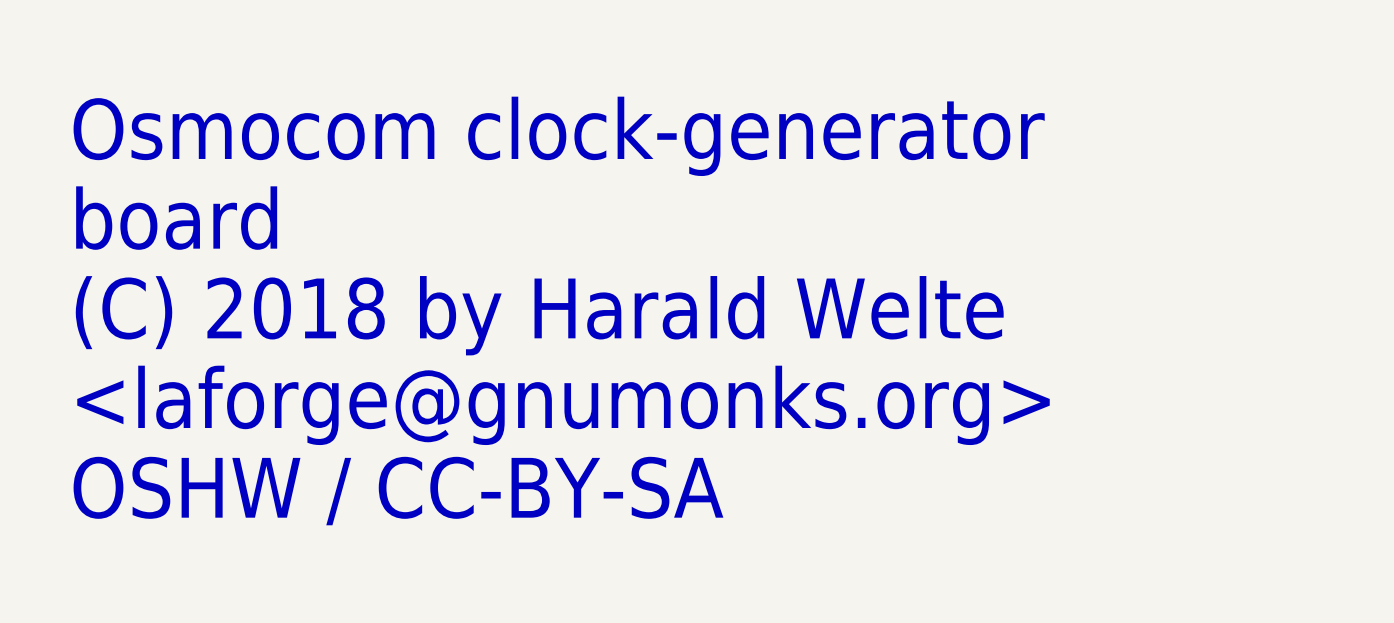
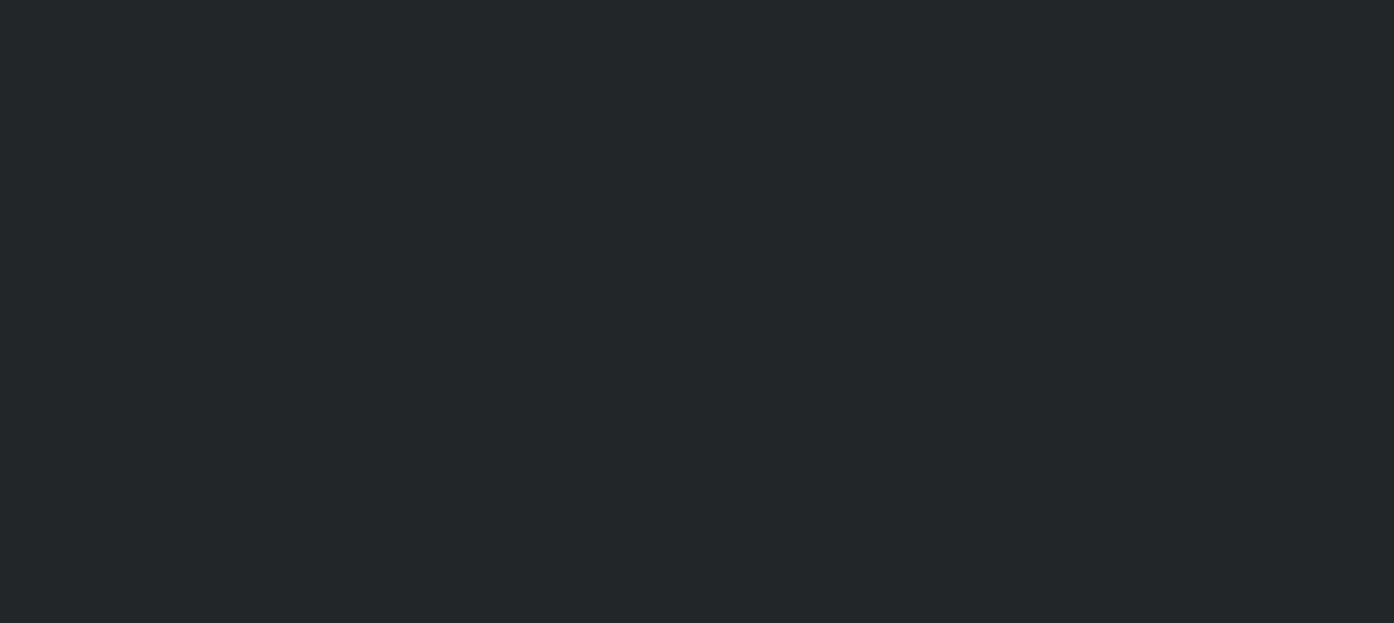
text: Osmocom clock-generator (559, 136) -> none
text: board (176, 218) -> none
text: (C) 2018 by Harald Welte (539, 315) -> none
text: <laforge@gnumonks.org> (563, 405) -> none
text: OSHW / CC-BY-SA (398, 491) -> none

